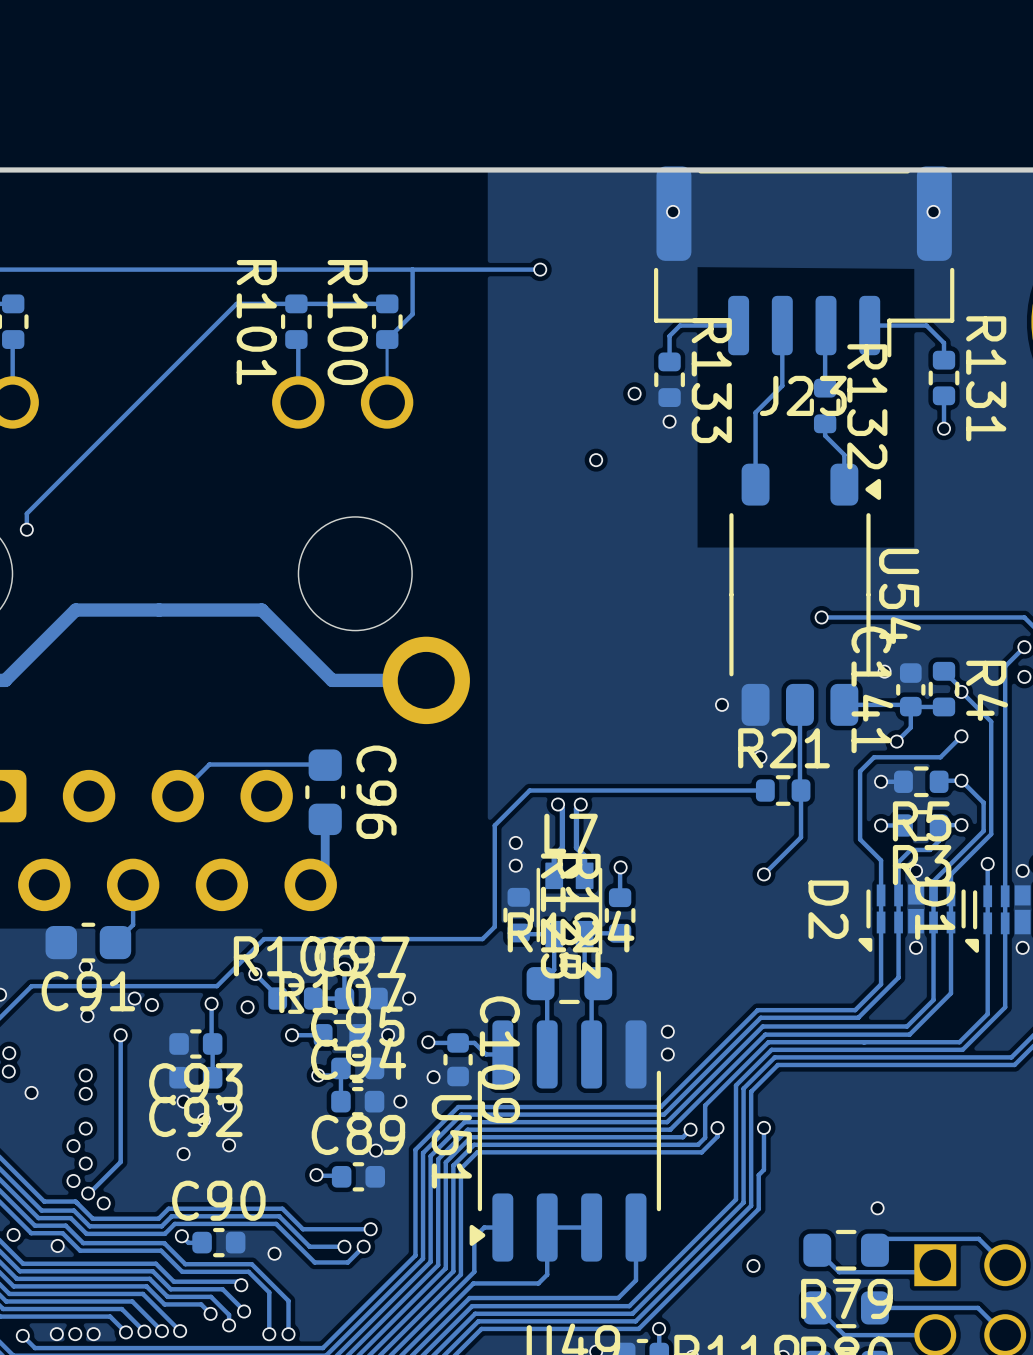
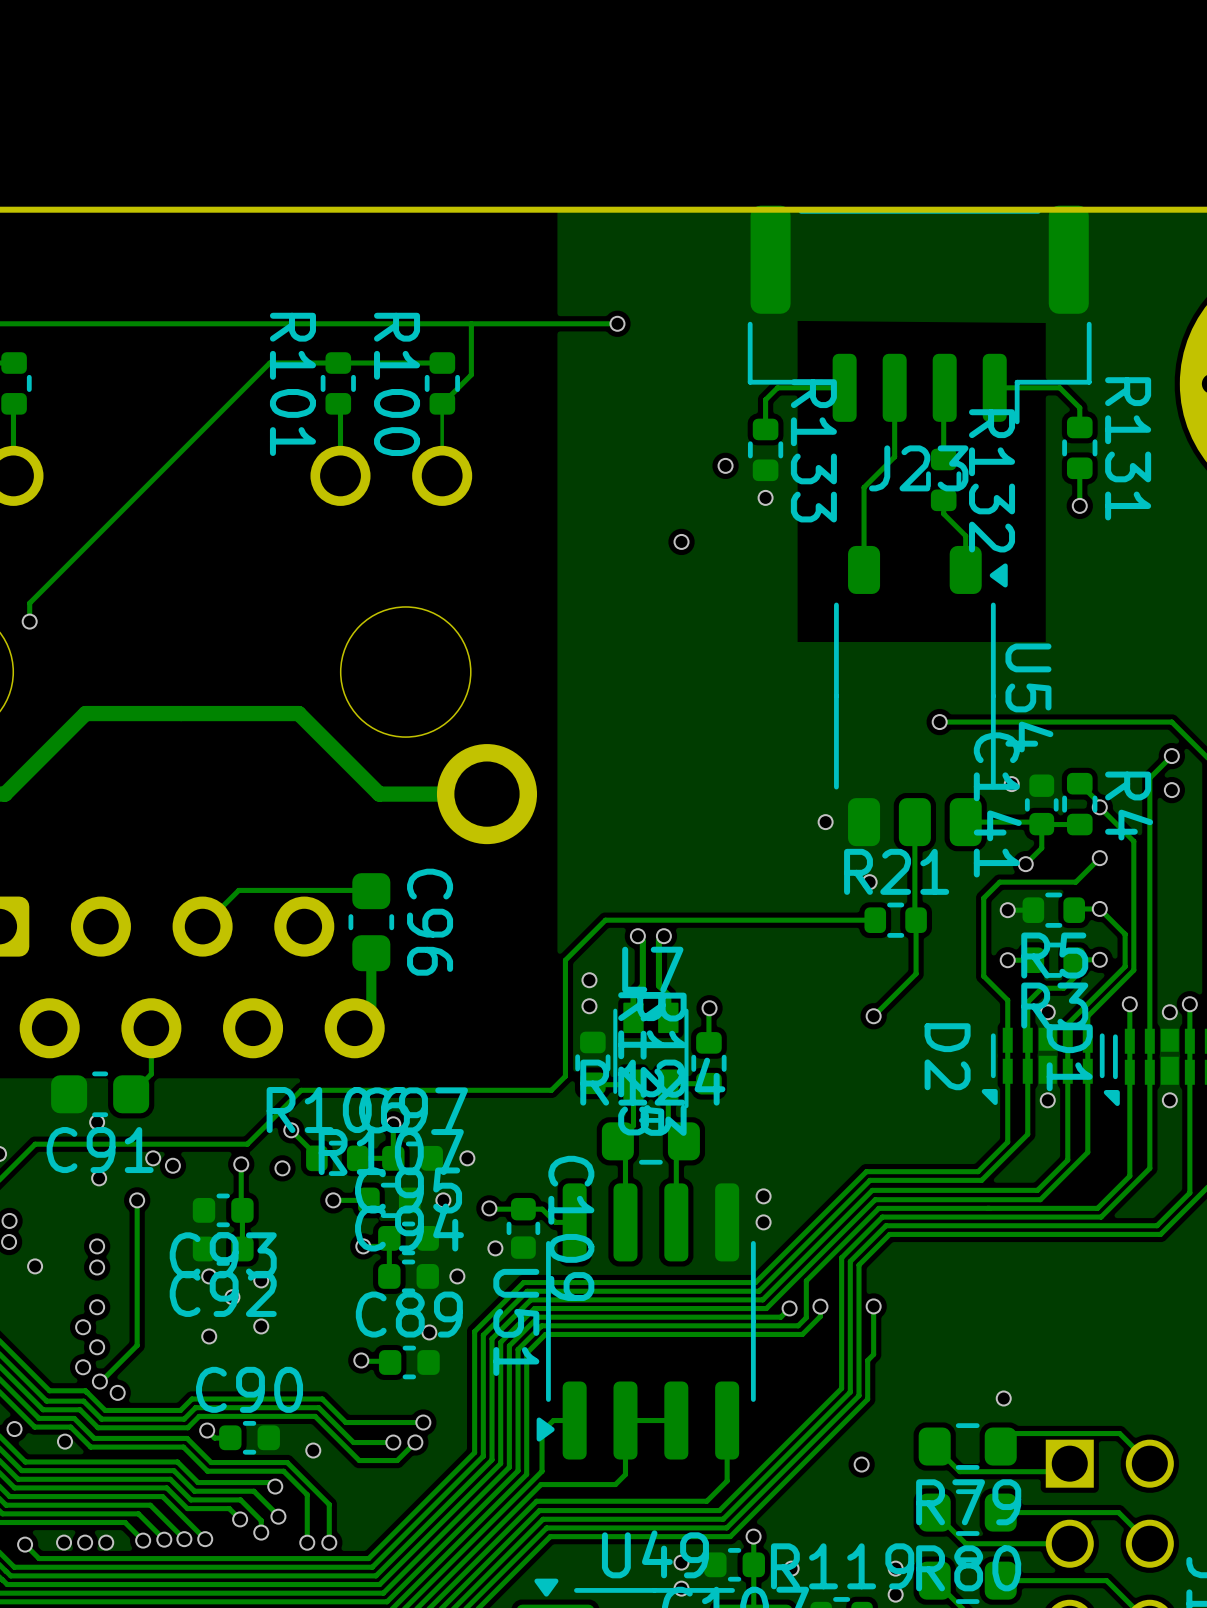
via: (673, 211) -> none
via: (933, 211) -> none

